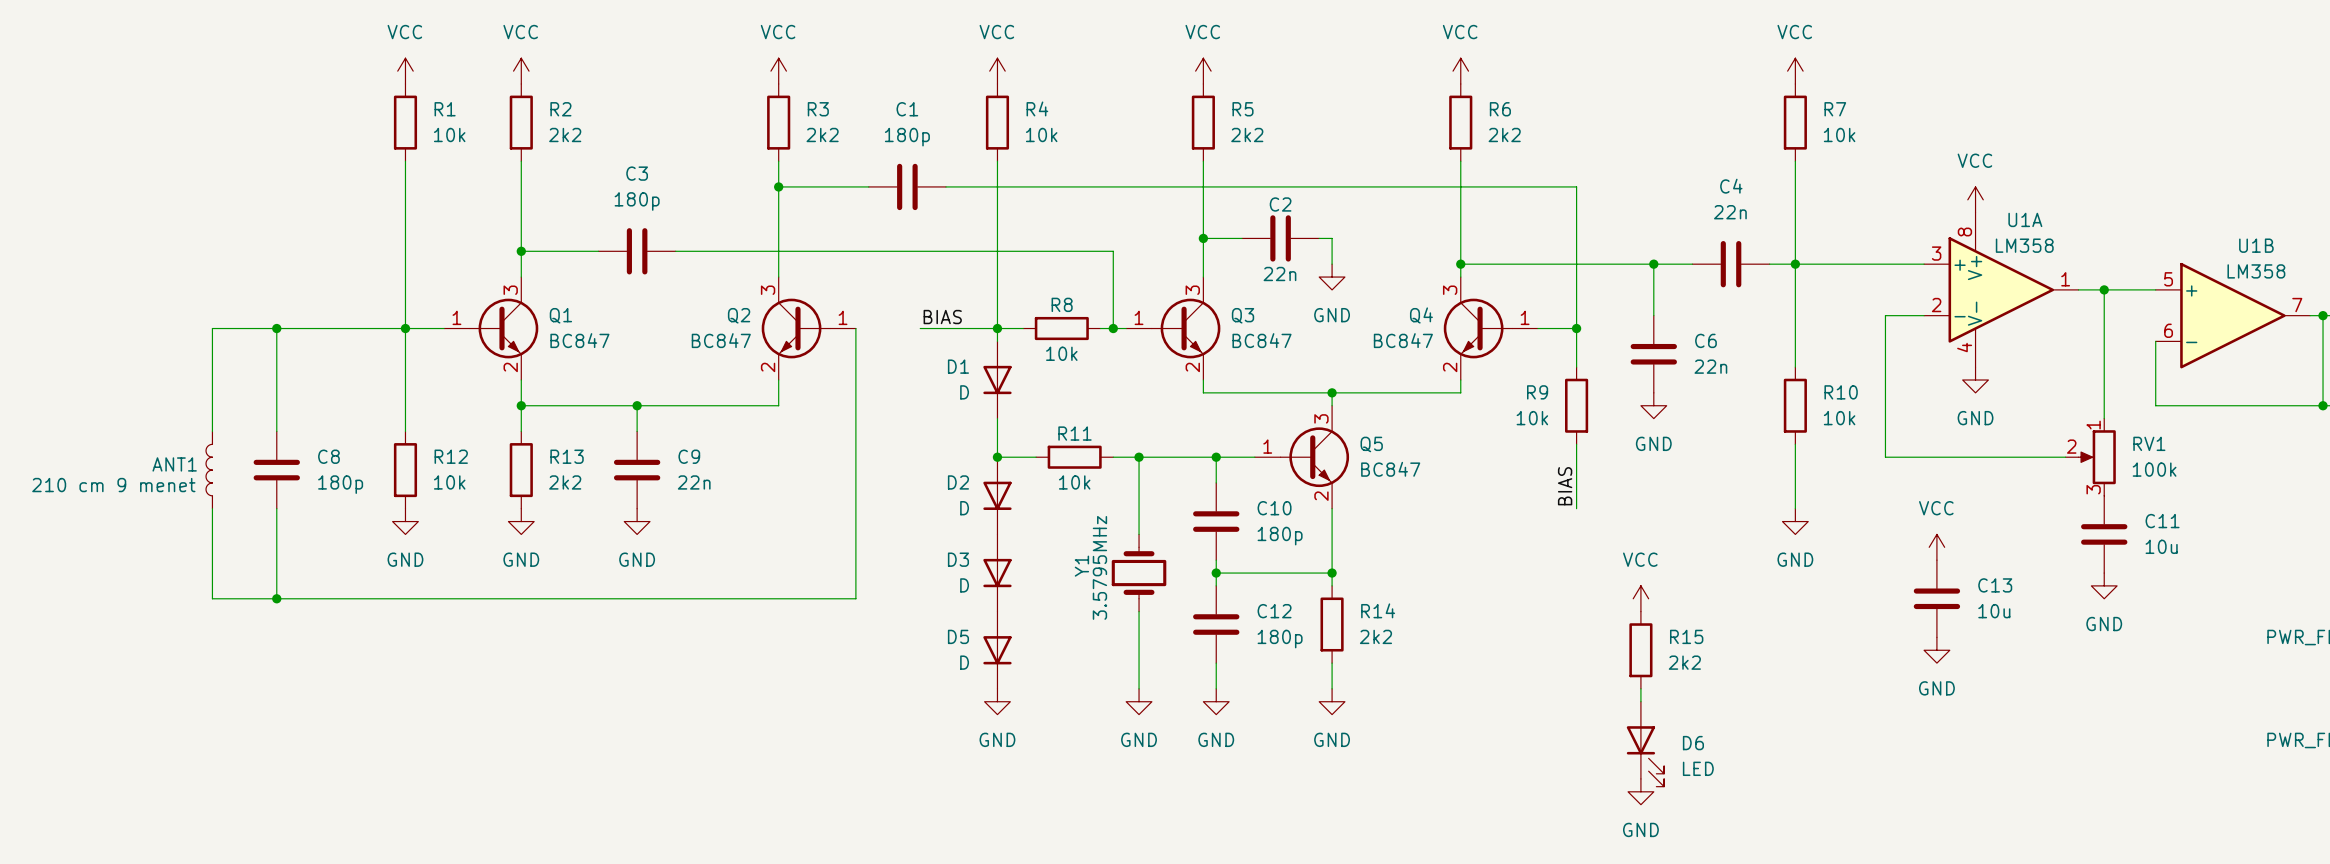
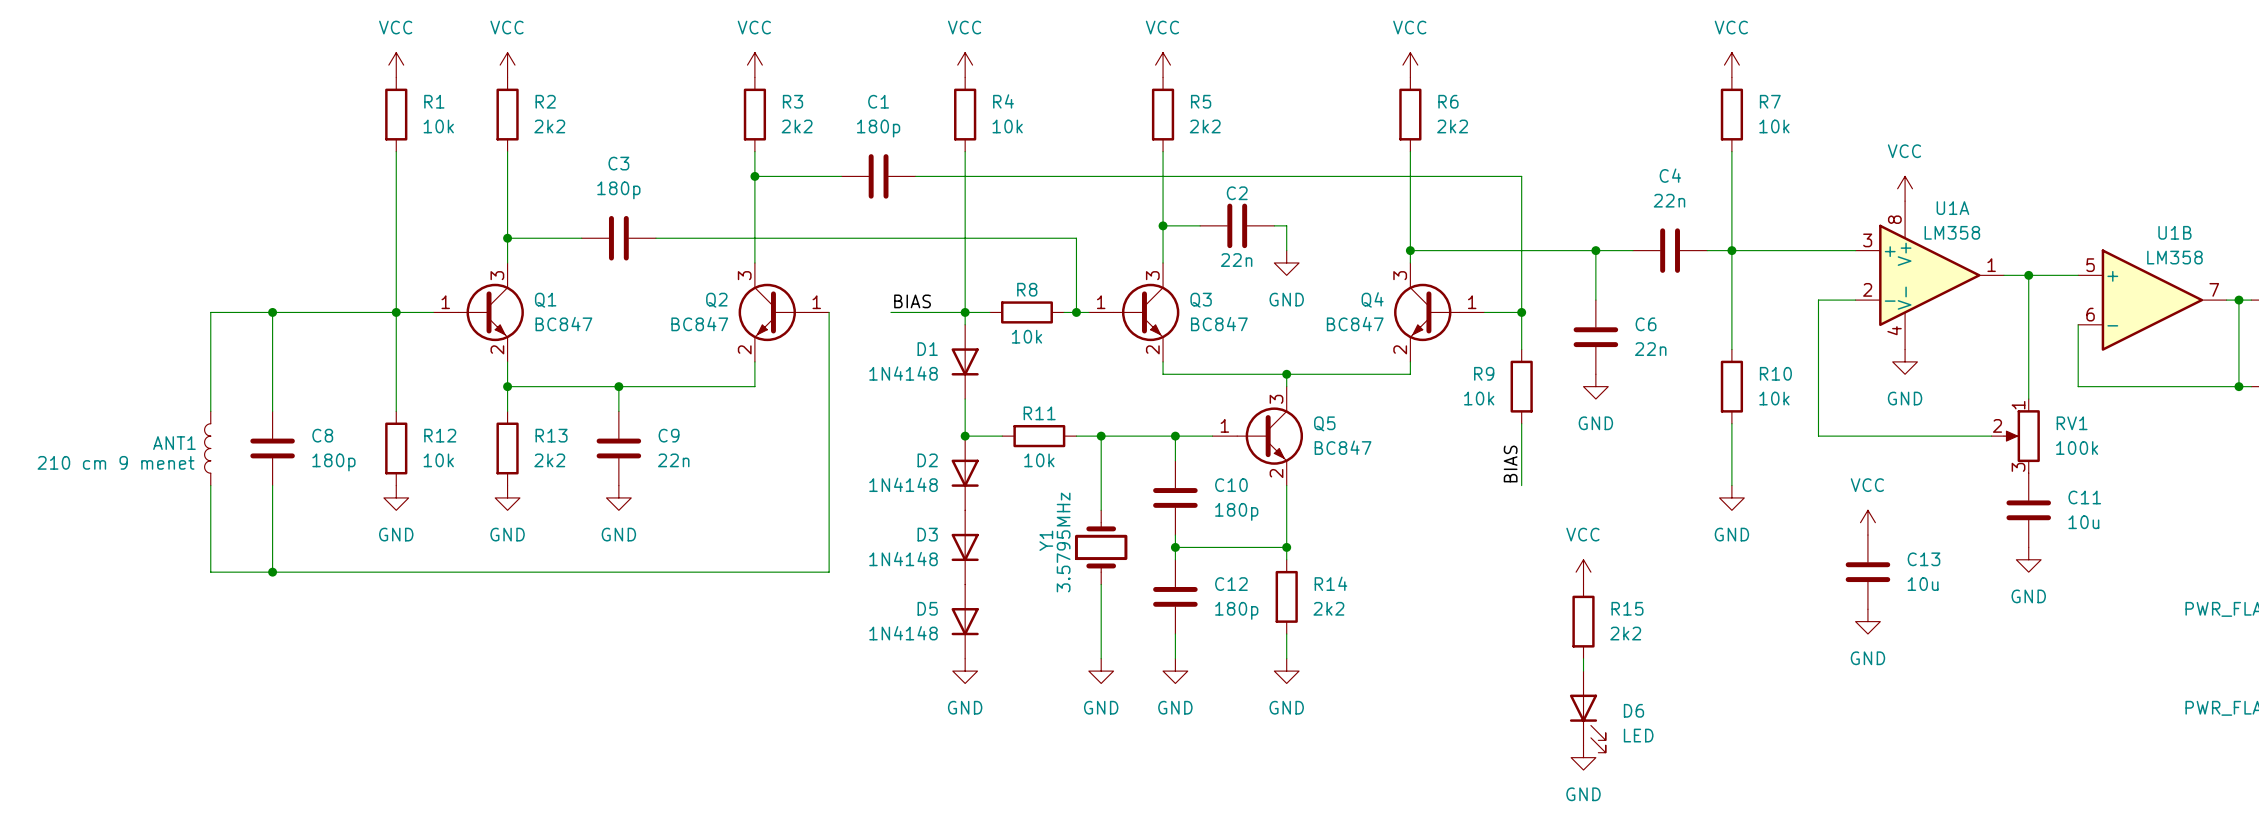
D1 value: D (964, 392) -> 1N4148 (903, 373)
D2 value: D (964, 508) -> 1N4148 (903, 484)
D3 value: D (964, 585) -> 1N4148 (903, 559)
D5 value: D (964, 662) -> 1N4148 (903, 633)

